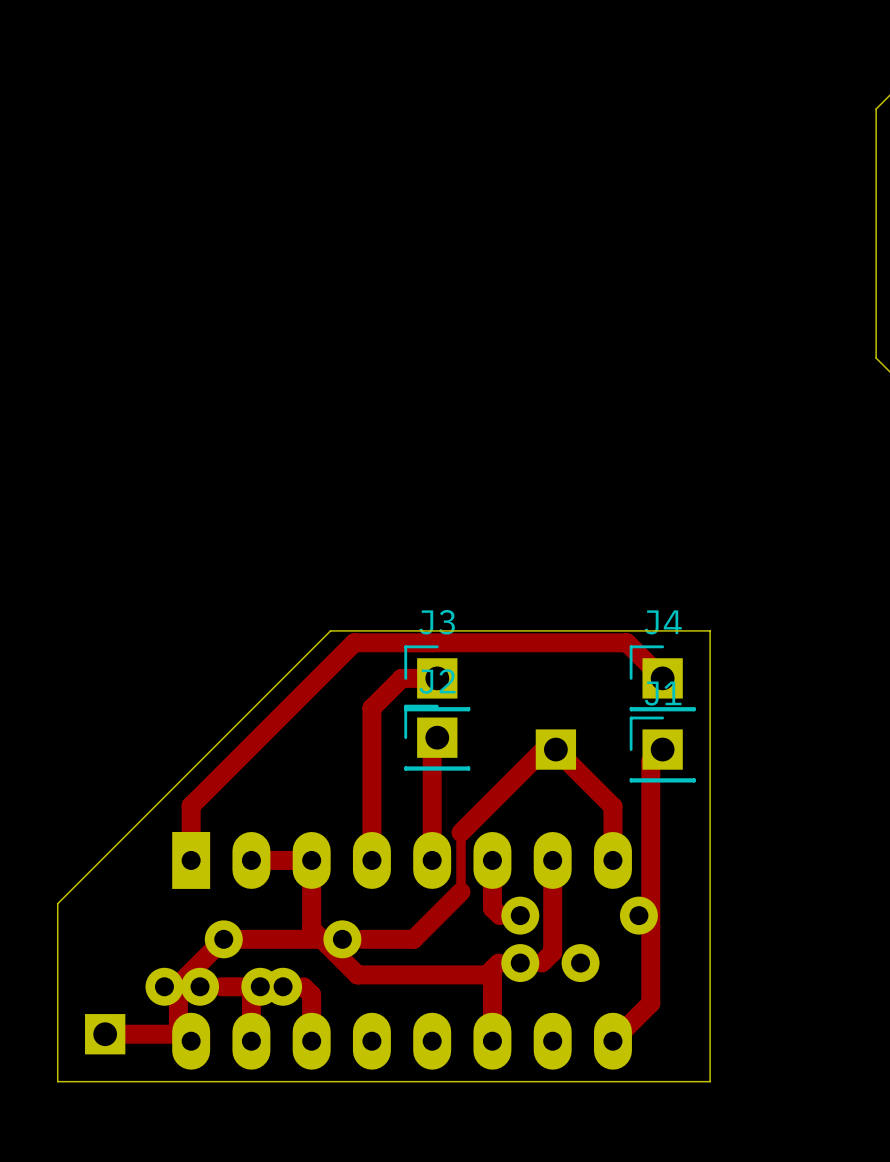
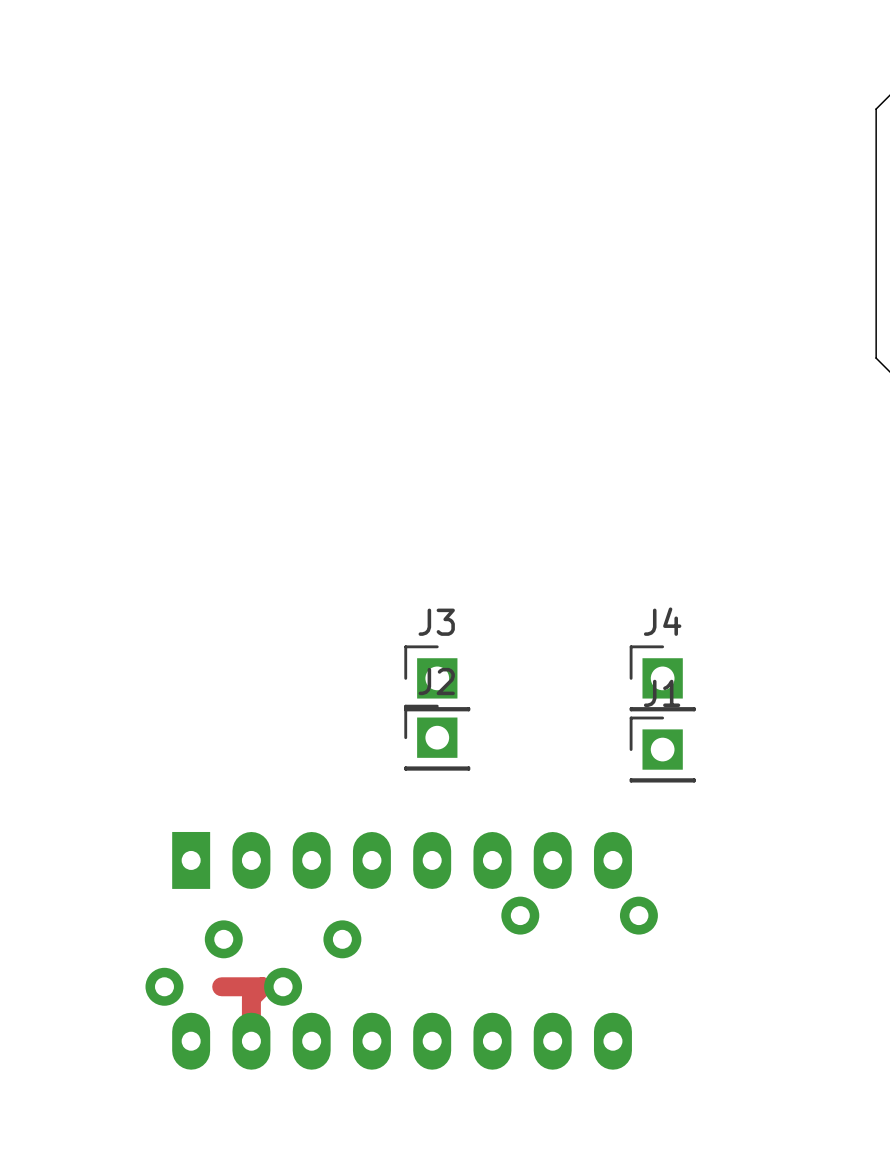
board edge: (710, 630) (330, 630) (57, 903) (57, 1081) (710, 1081) (710, 630) -> none
top track: (437, 678) (401, 678) (371, 708) (371, 860) -> none
top track: (662, 678) (627, 642) (354, 642) (191, 805) (191, 860) -> none
top track: (437, 737) (432, 742) (432, 860) -> none
part: (555, 749) -> none
top track: (662, 749) (650, 761) (650, 1003) (612, 1041) -> none
top track: (251, 860) (311, 860) (311, 929) (357, 974) (492, 974) -> none
top track: (492, 860) (492, 908) (499, 915) -> none
top track: (552, 860) (552, 952) (541, 963) -> none
top track: (612, 860) (612, 806) (555, 749) (544, 749) (461, 832) (461, 891) (413, 939) (362, 939) -> none
top track: (321, 939) (223, 939) (178, 984) (178, 1028) (191, 1041) -> none
top track: (498, 963) (492, 969) (492, 1041) -> none
part: (550, 963) -> none
part: (230, 986) -> none
top track: (303, 986) (311, 994) (311, 1041) -> none
part: (105, 1034) -> none
top track: (184, 1034) (105, 1034) -> none

